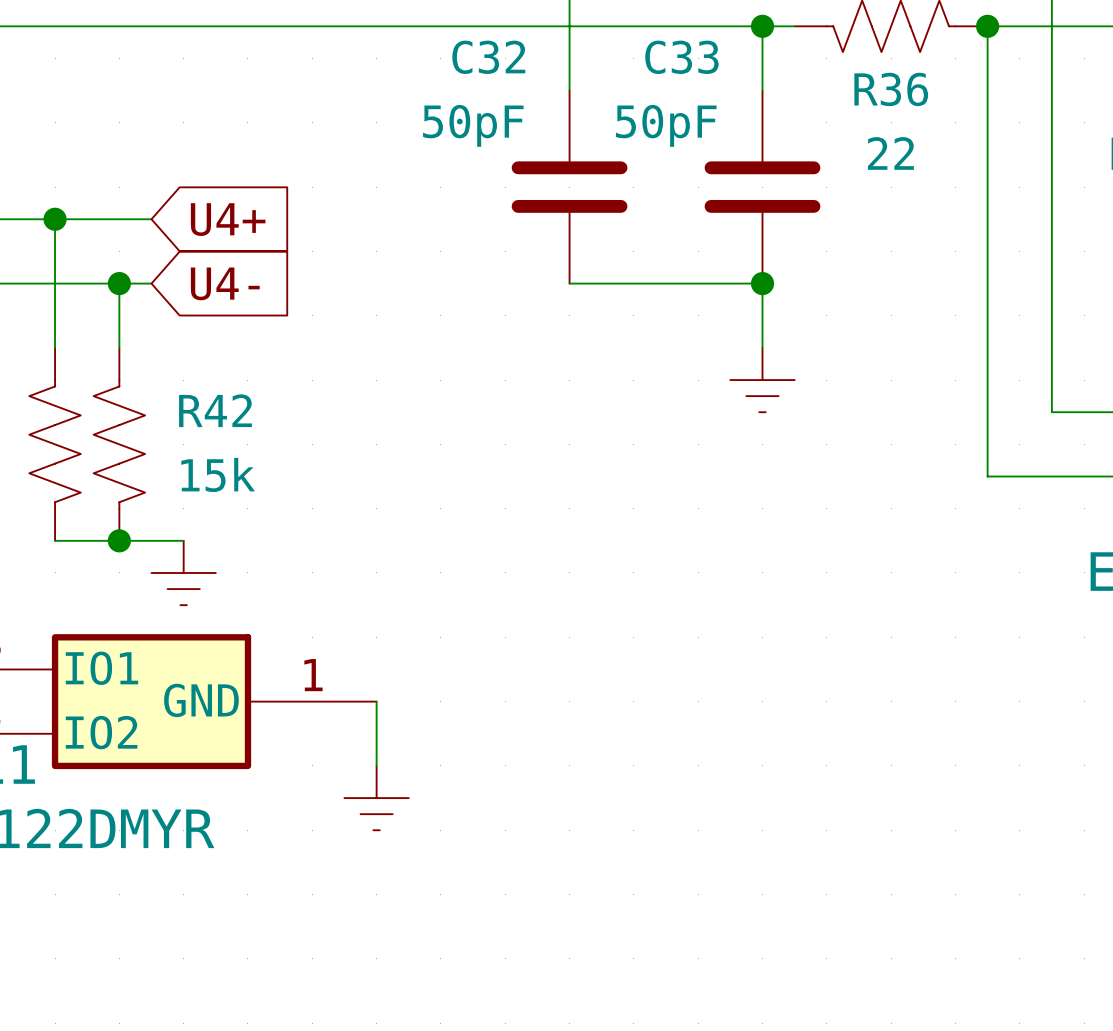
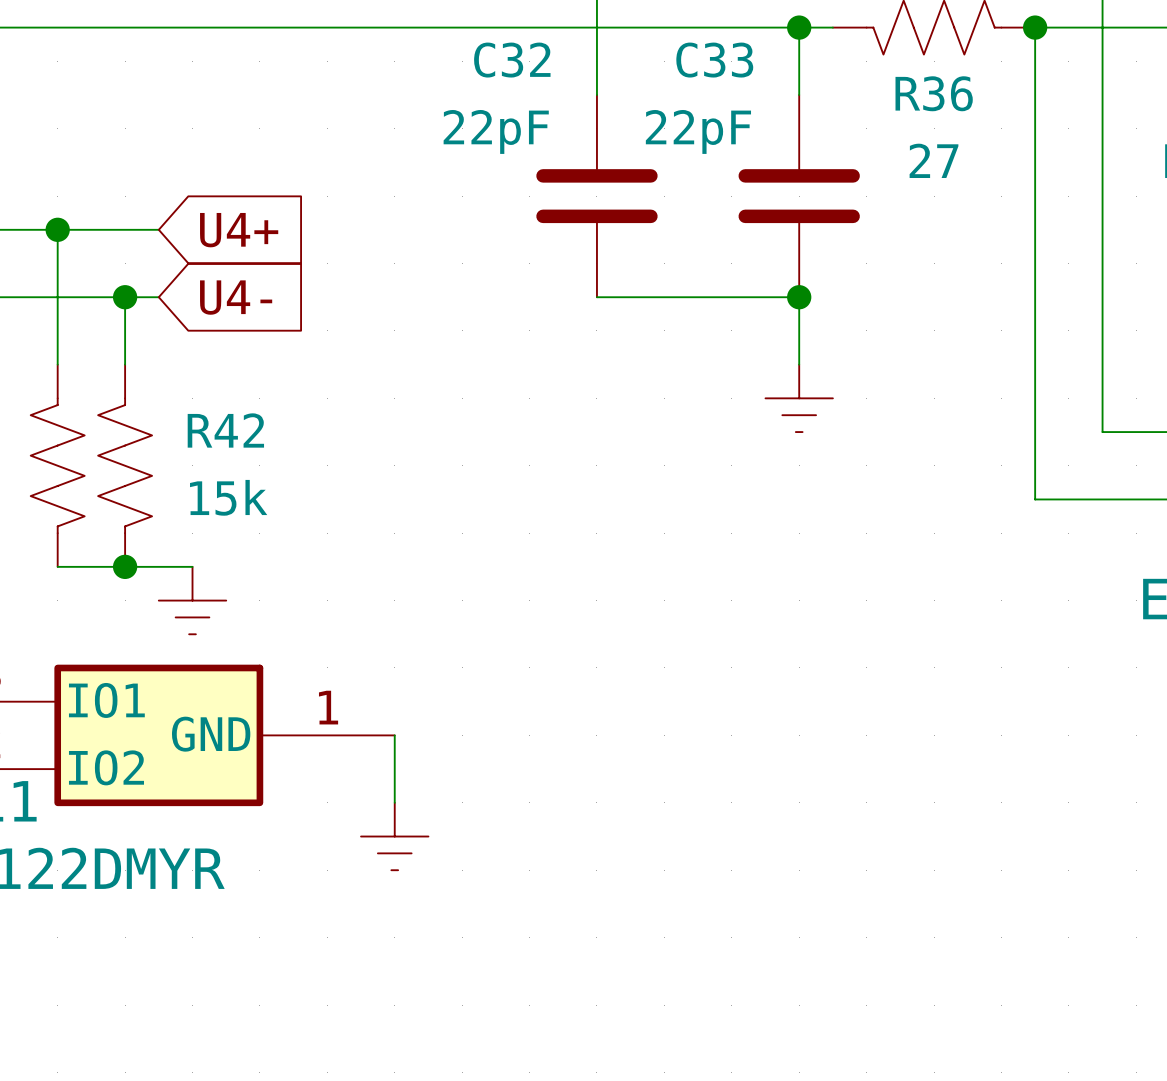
C32 value: 50pF (473, 125) -> 22pF (496, 131)
C33 value: 50pF (666, 125) -> 22pF (698, 131)
R36 value: 22 (890, 153) -> 27 (934, 160)

